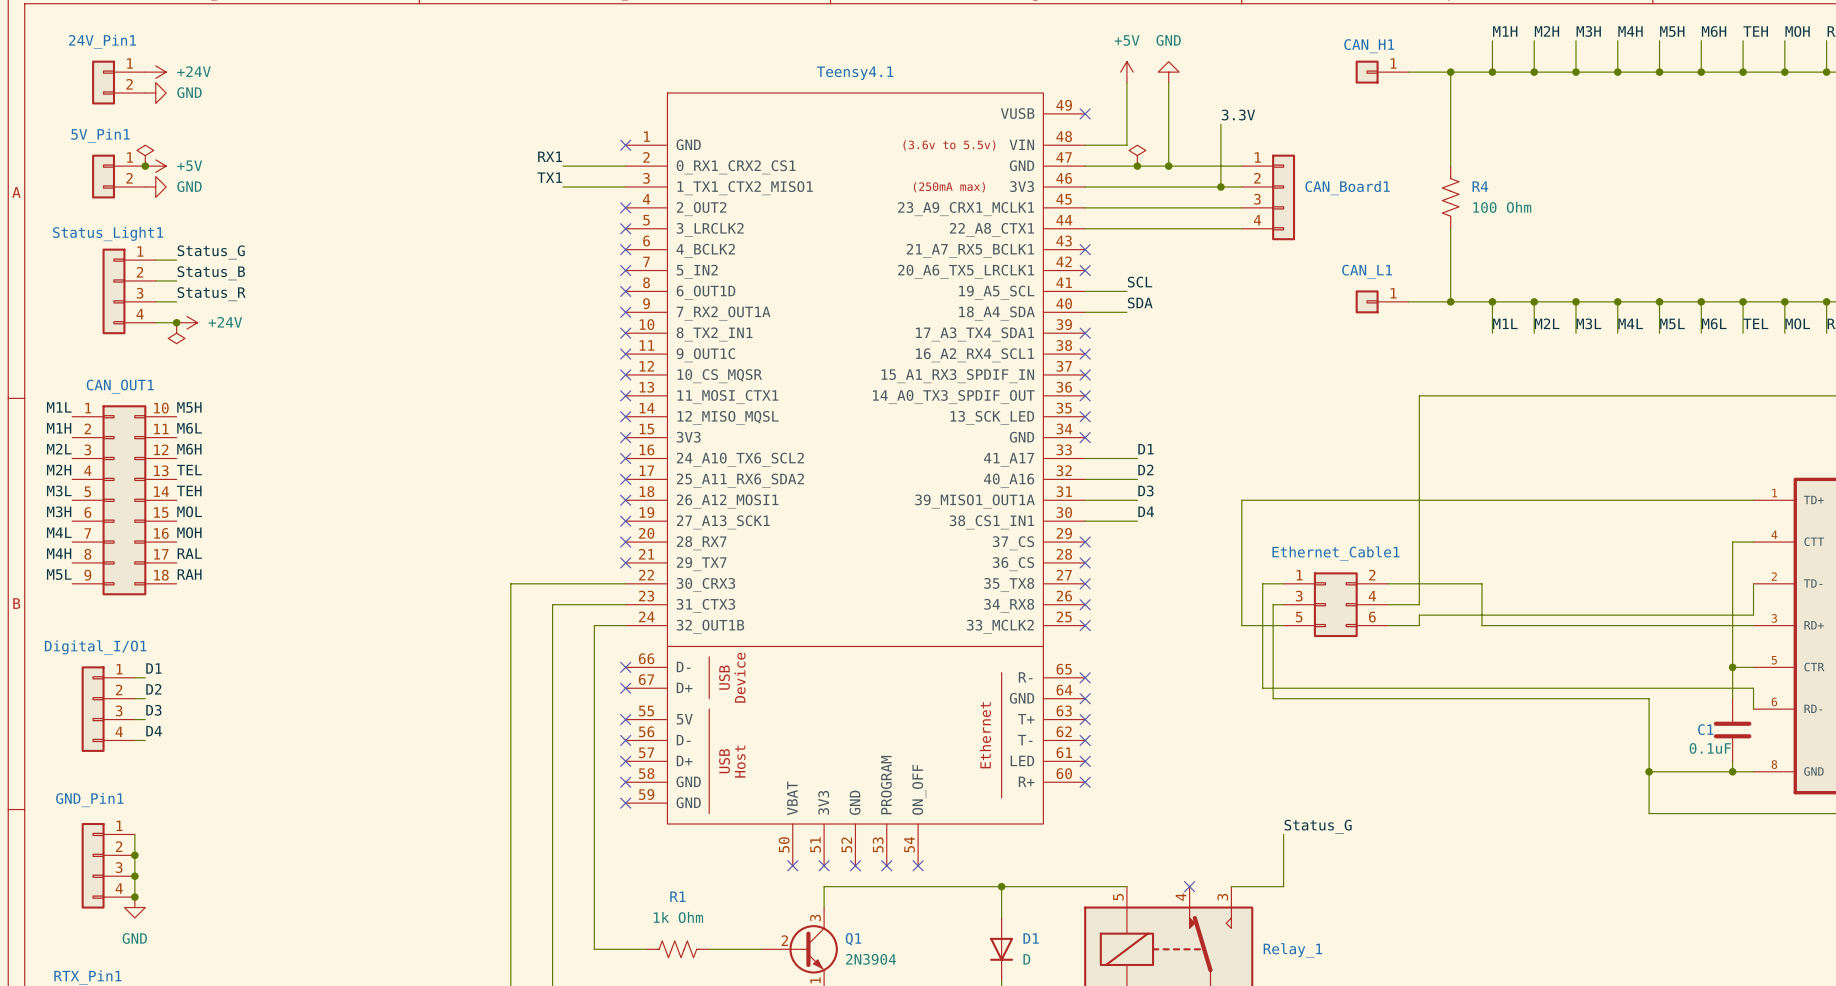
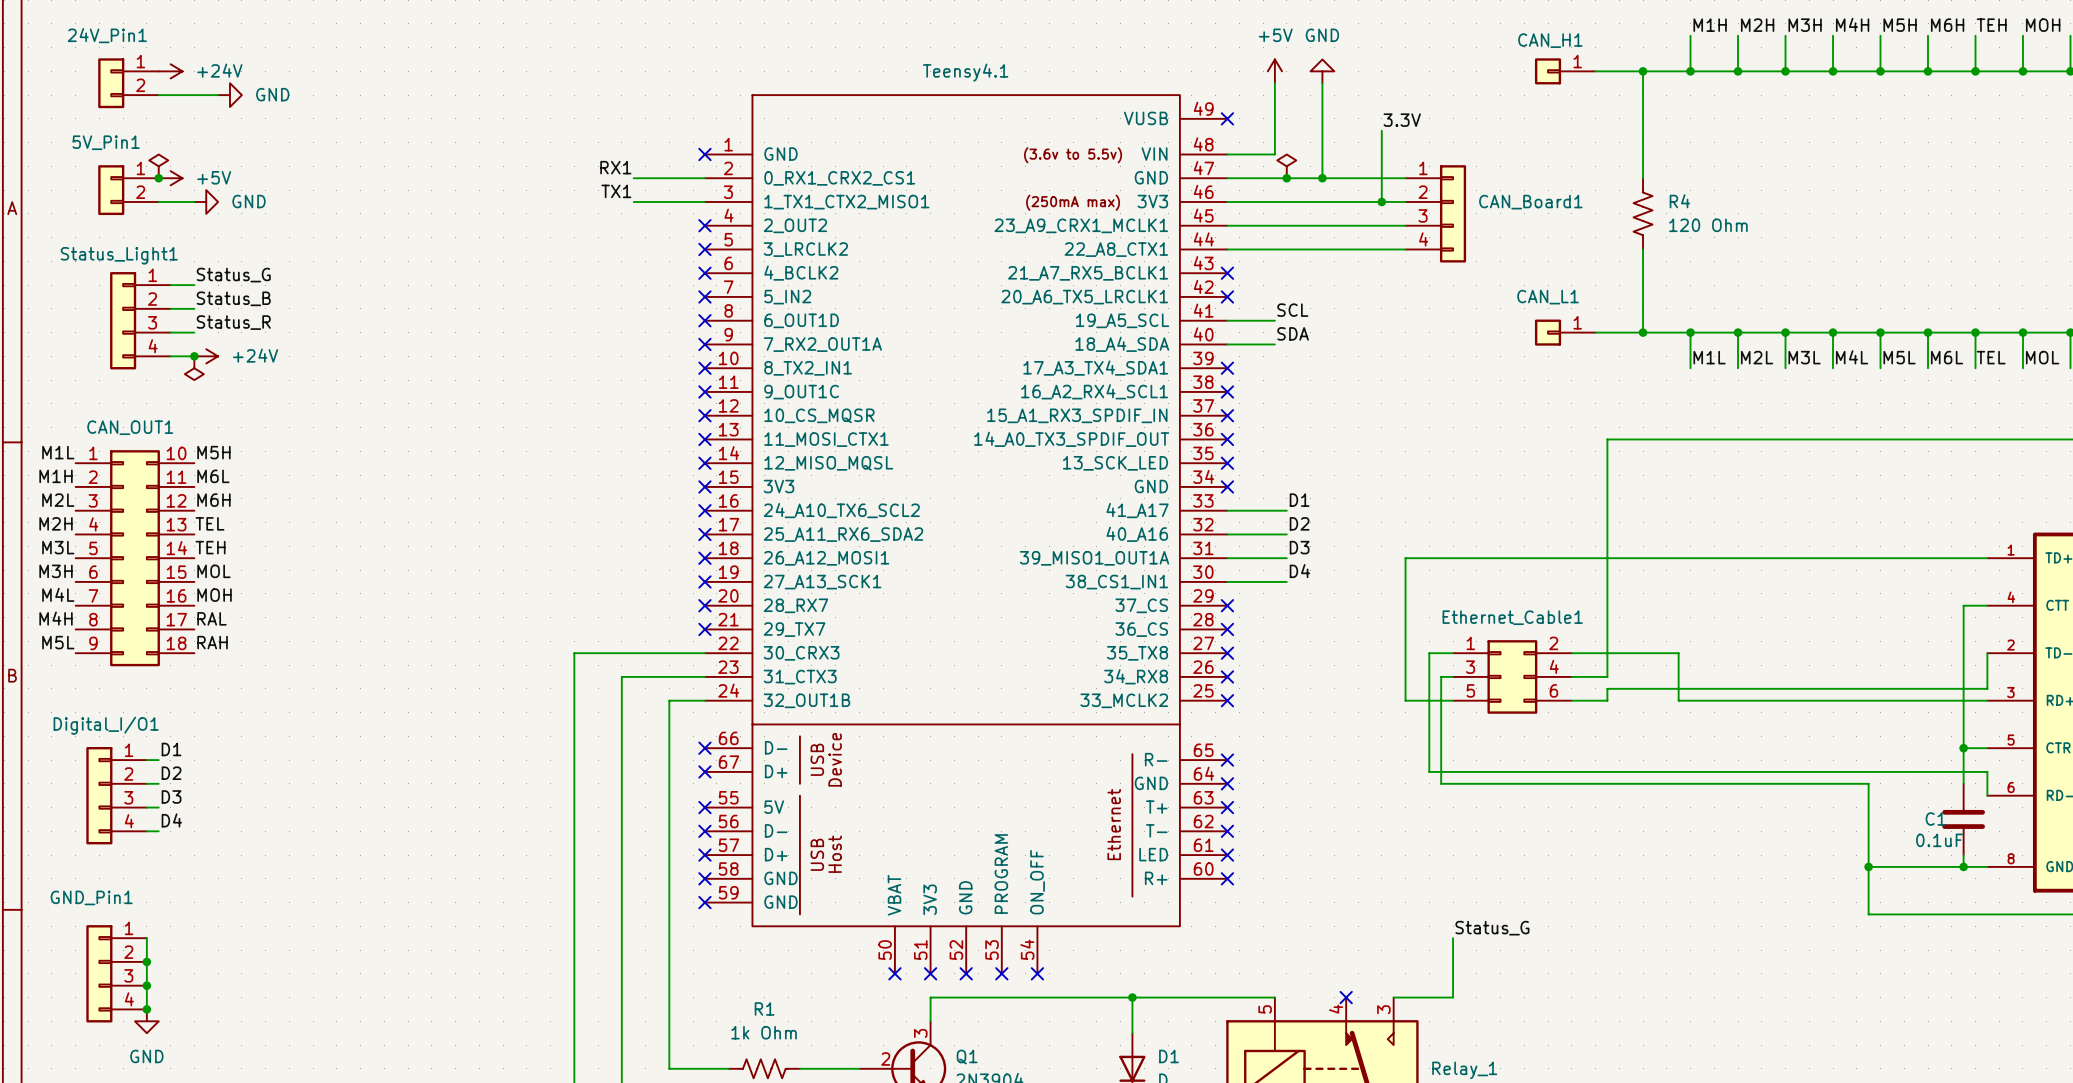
wire: none -> (158, 95) (218, 95)
power symbol: GND (155, 93) -> none
power symbol: none -> GND (229, 95)
wire: none -> (158, 201) (194, 201)
power symbol position: GND (155, 186) -> GND (206, 201)
R4 value: 100 Ohm (1502, 207) -> 120 Ohm (1708, 225)

